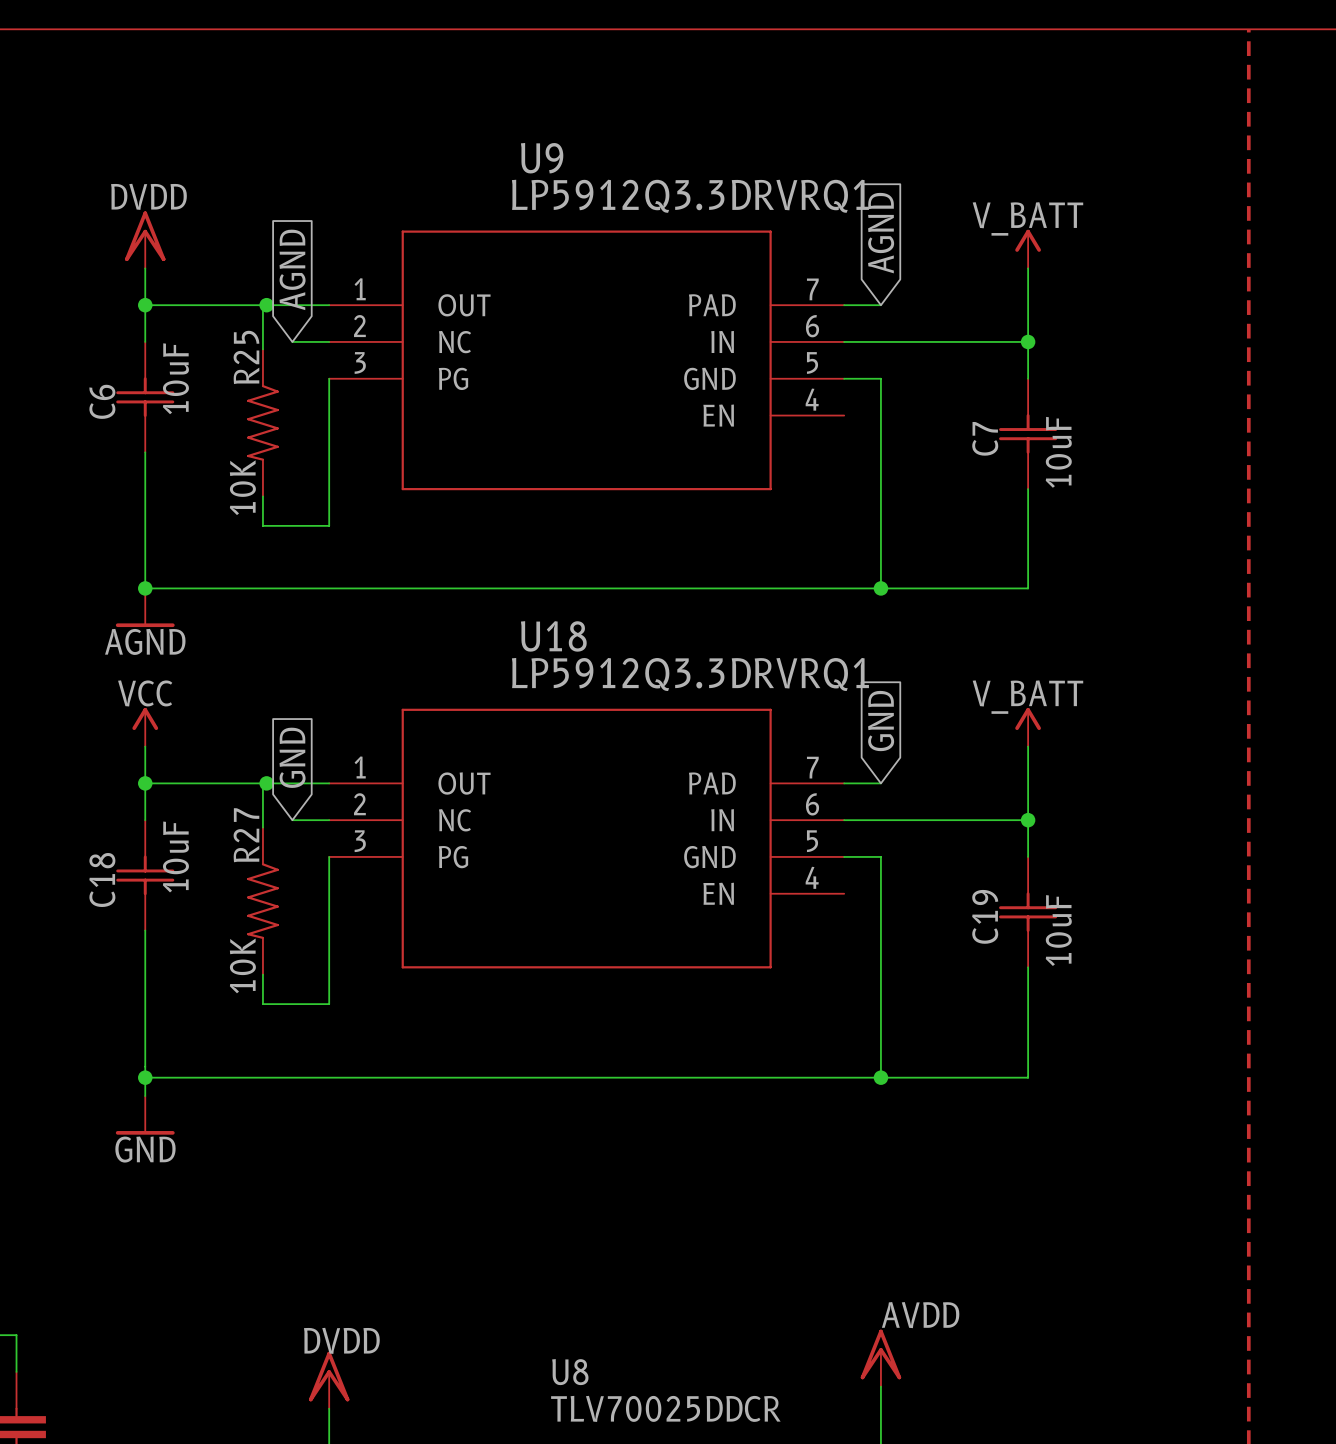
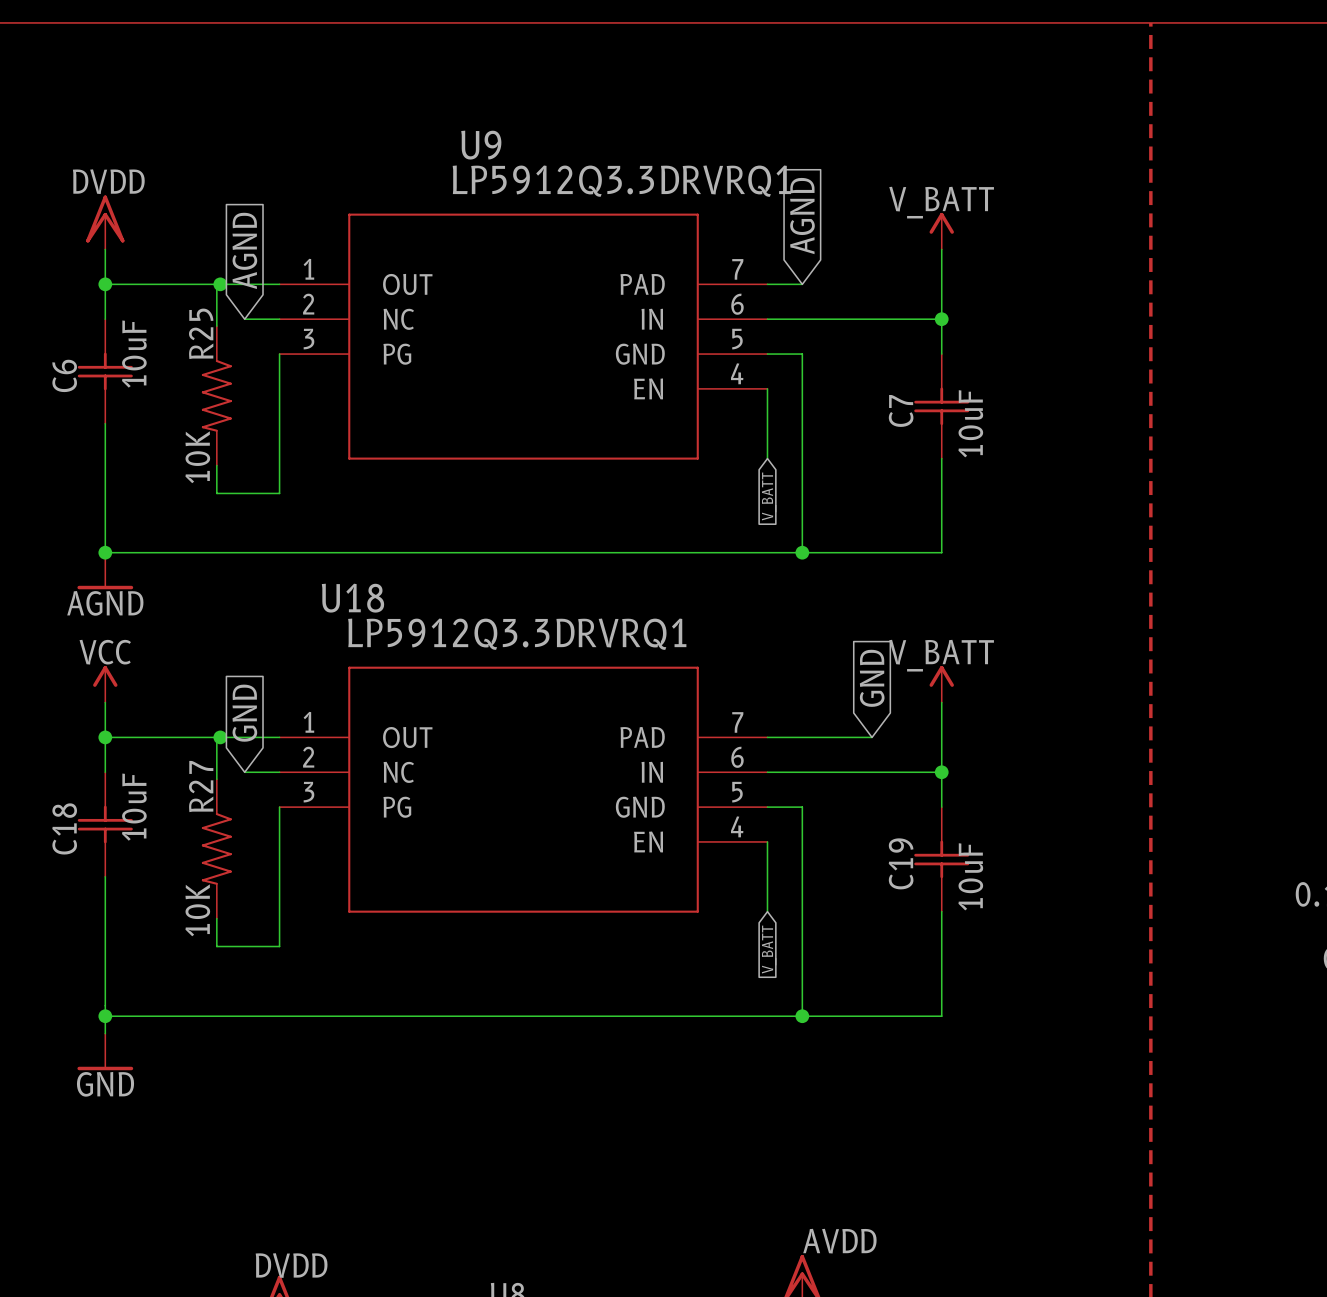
wire: none -> (767, 388) (767, 458)
global label: none -> V_BATT (769, 496)
U18 name position: U18 (553, 636) -> U18 (352, 598)
U18 value position: LP5912Q3.3DRVRQ1 (690, 674) -> LP5912Q3.3DRVRQ1 (517, 634)
global label position: GND (881, 721) -> GND (872, 678)
wire: none -> (802, 737) (872, 737)
wire: none -> (767, 841) (767, 911)
global label: none -> V_BATT (769, 949)

